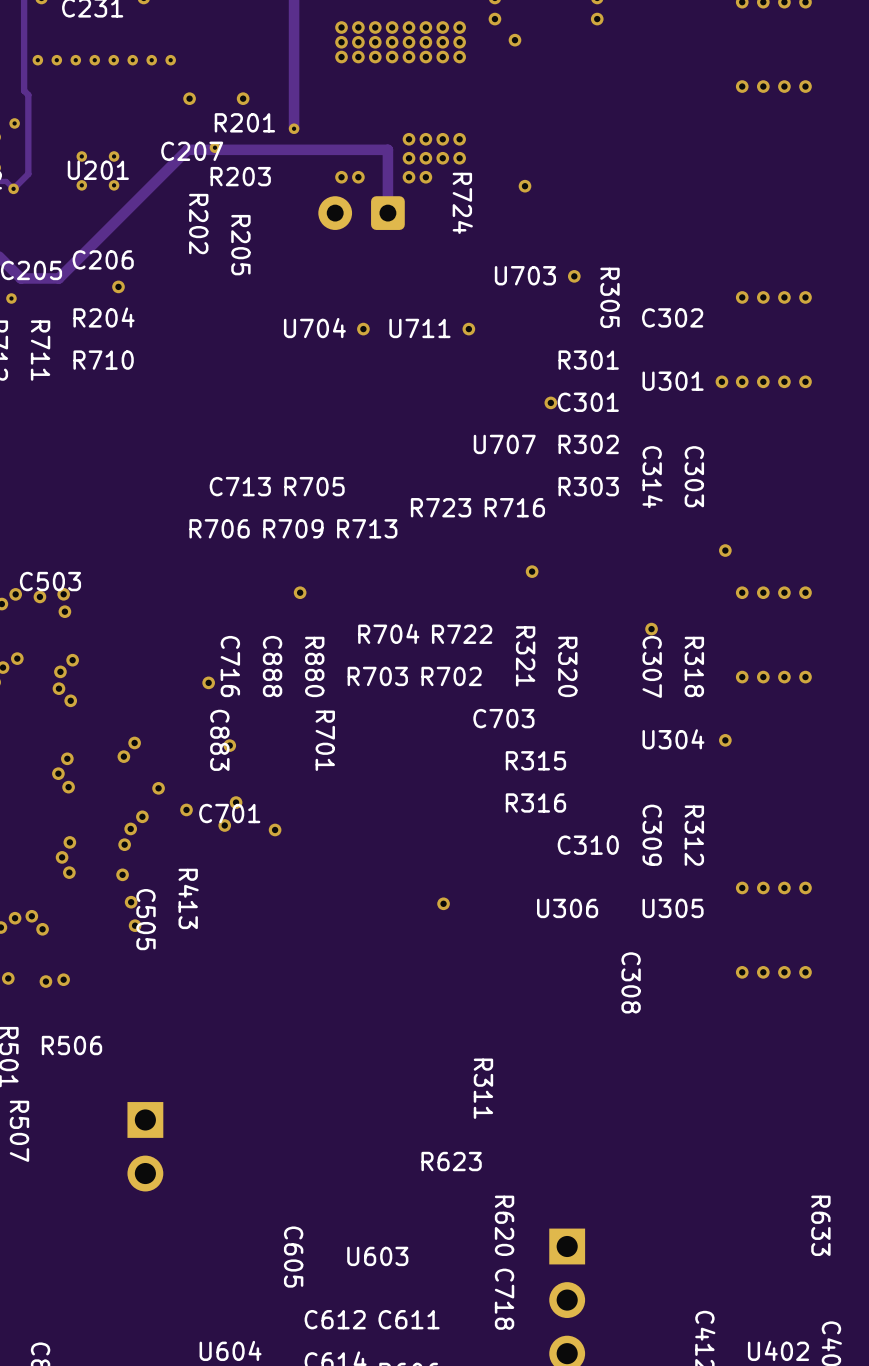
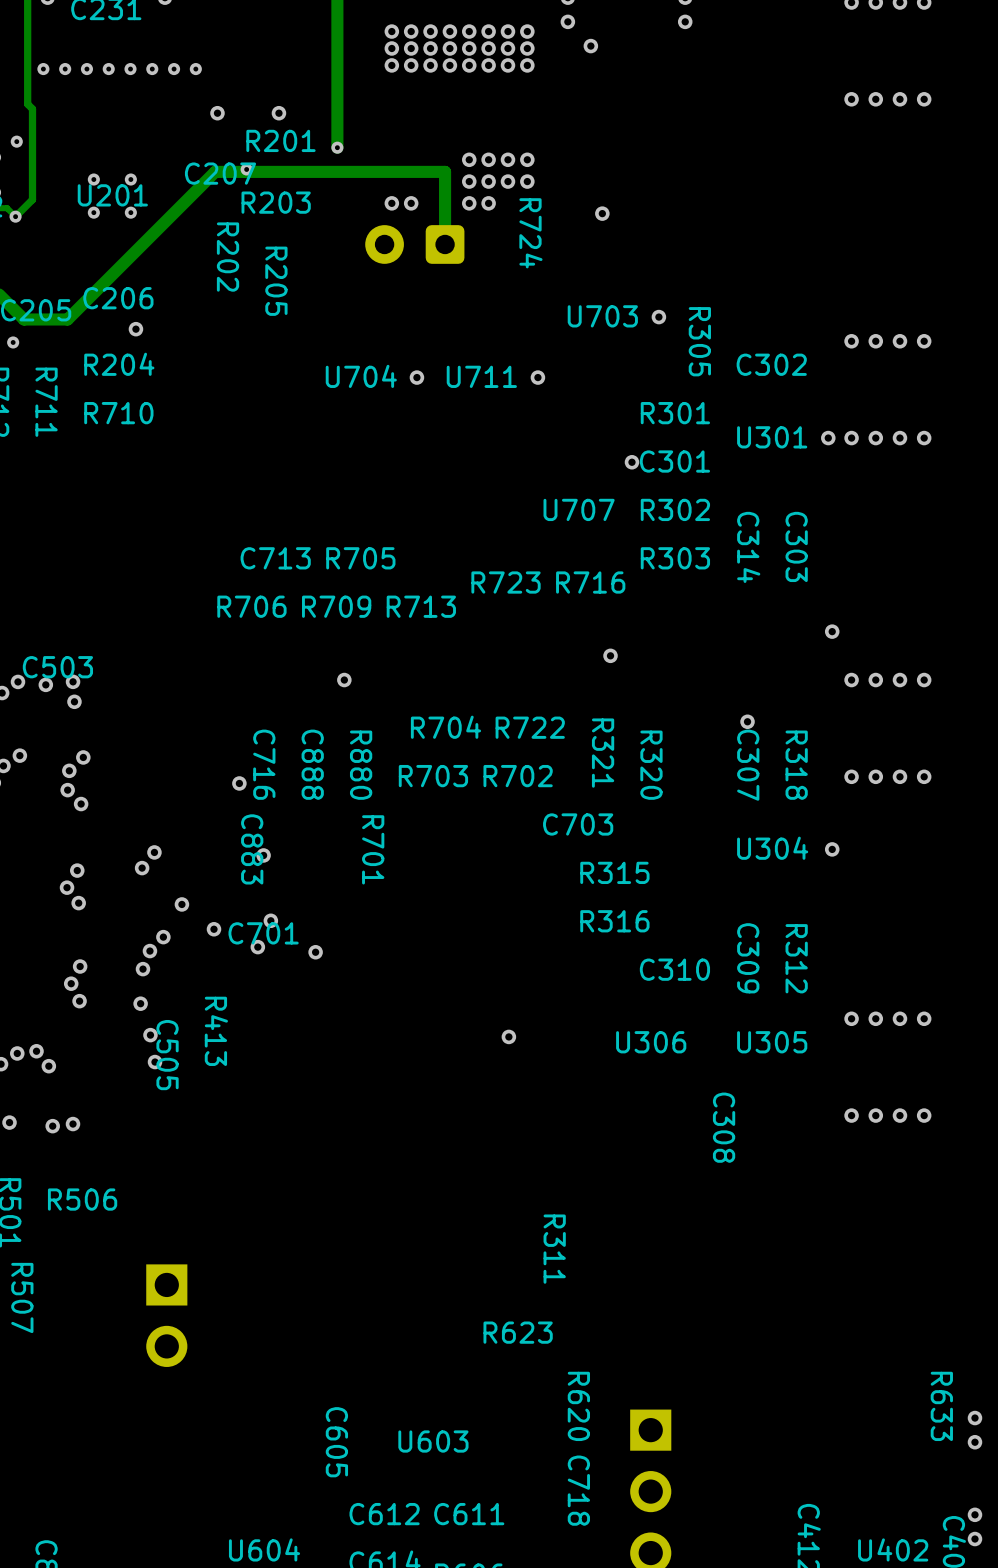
via: none -> (974, 1418)
via: none -> (974, 1442)
via: none -> (974, 1514)
via: none -> (974, 1539)

